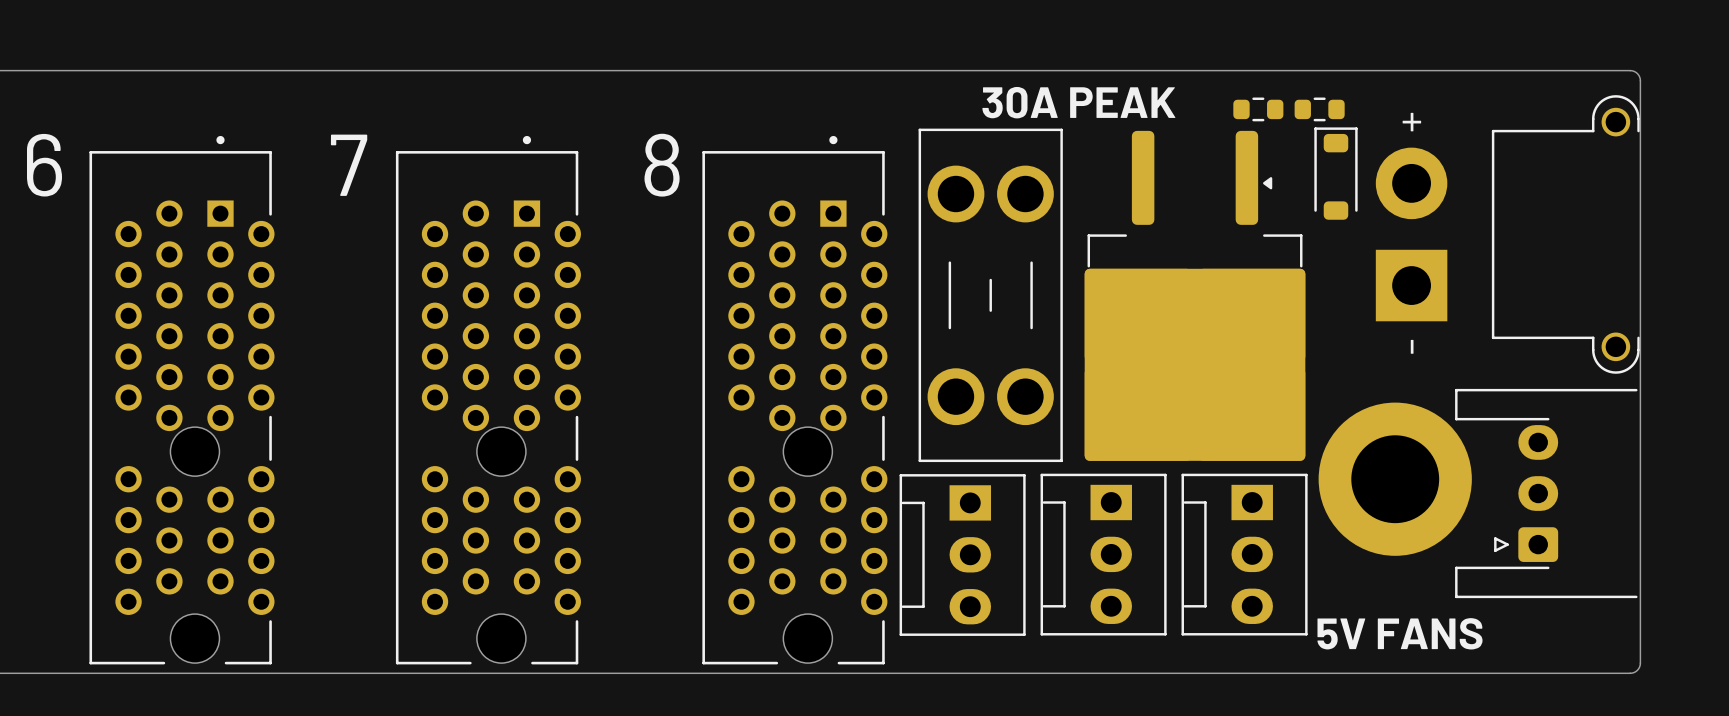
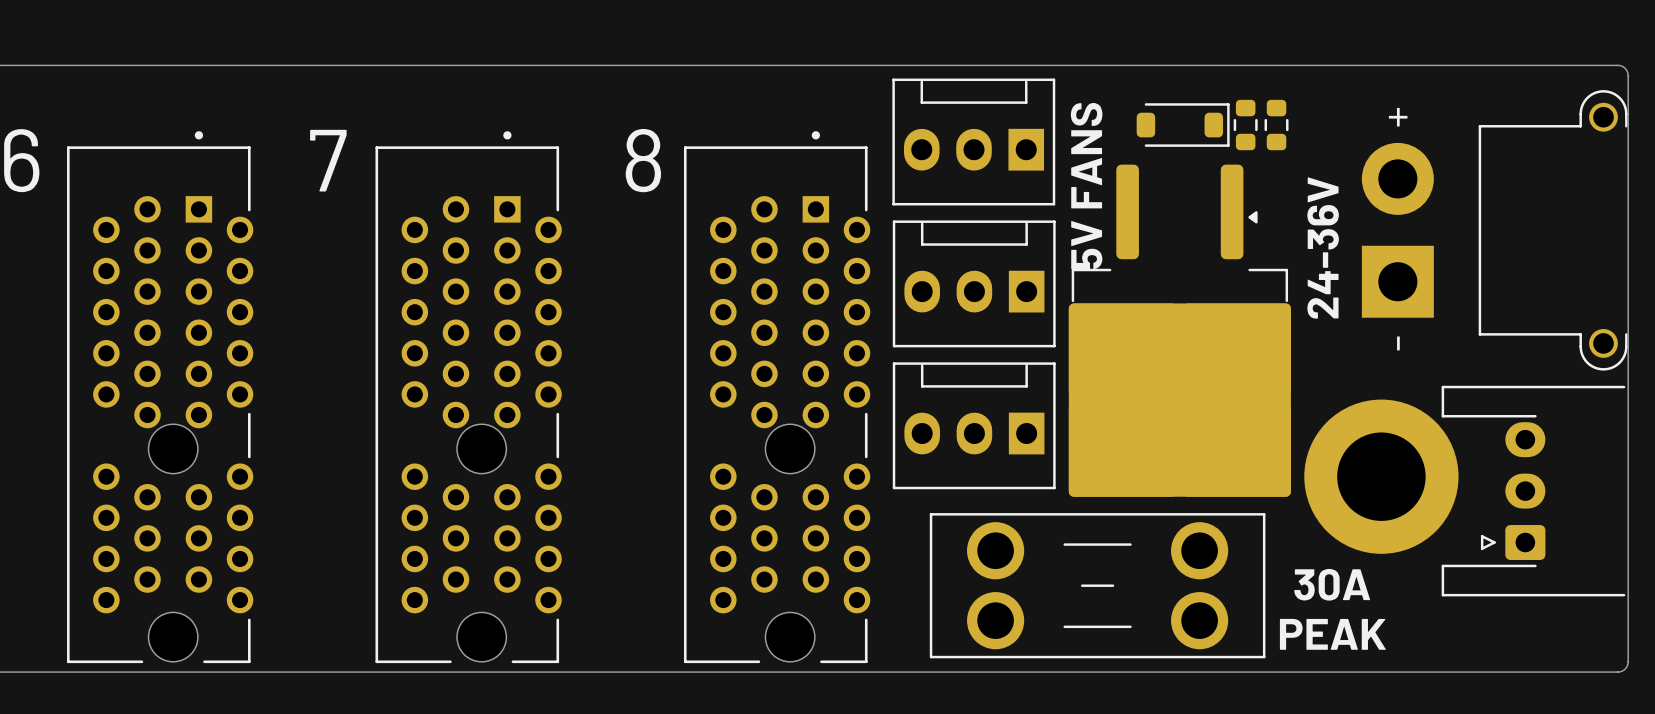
text: 30A PEAK (1078, 102) -> none
part: (1258, 109) -> none
part: (1319, 109) -> none
part footprint: [918, 128, 1063, 463] -> [892, 220, 1056, 348]
part: none -> (1245, 125)
part: none -> (1276, 125)
part: none -> (973, 142)
part rotation: 0° (1335, 173) -> 90° clockwise (1183, 125)
part position: (1335, 173) -> (1183, 125)
text: none -> 24-36V (1323, 247)
part position: (1195, 295) -> (1179, 330)
part: none -> (974, 425)
part: (1103, 554) -> none
part: (1244, 554) -> none
part: (962, 555) -> none
text: none -> 30A (1332, 584)
part: none -> (1097, 585)
text rotation: 0° (1399, 633) -> 90° counterclockwise (1086, 186)
text position: 5V FANS (1399, 633) -> 5V FANS (1086, 186)
text: none -> PEAK (1332, 634)

